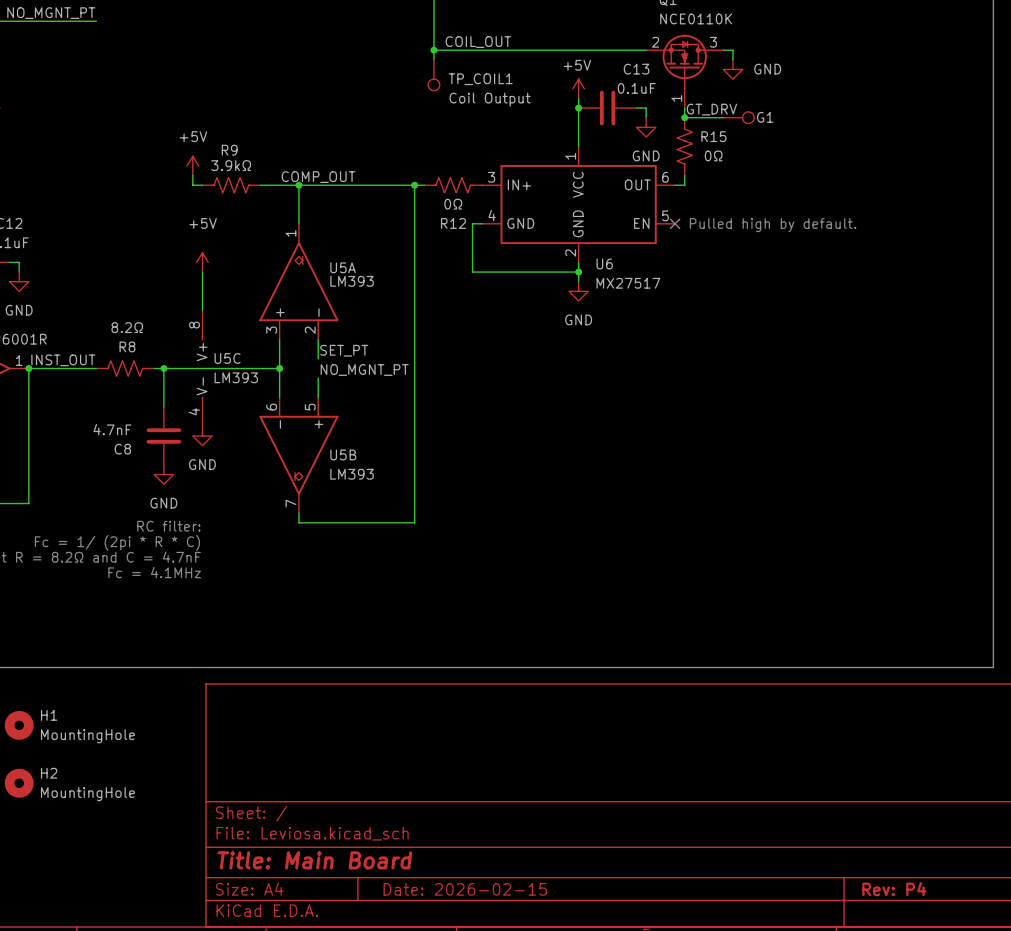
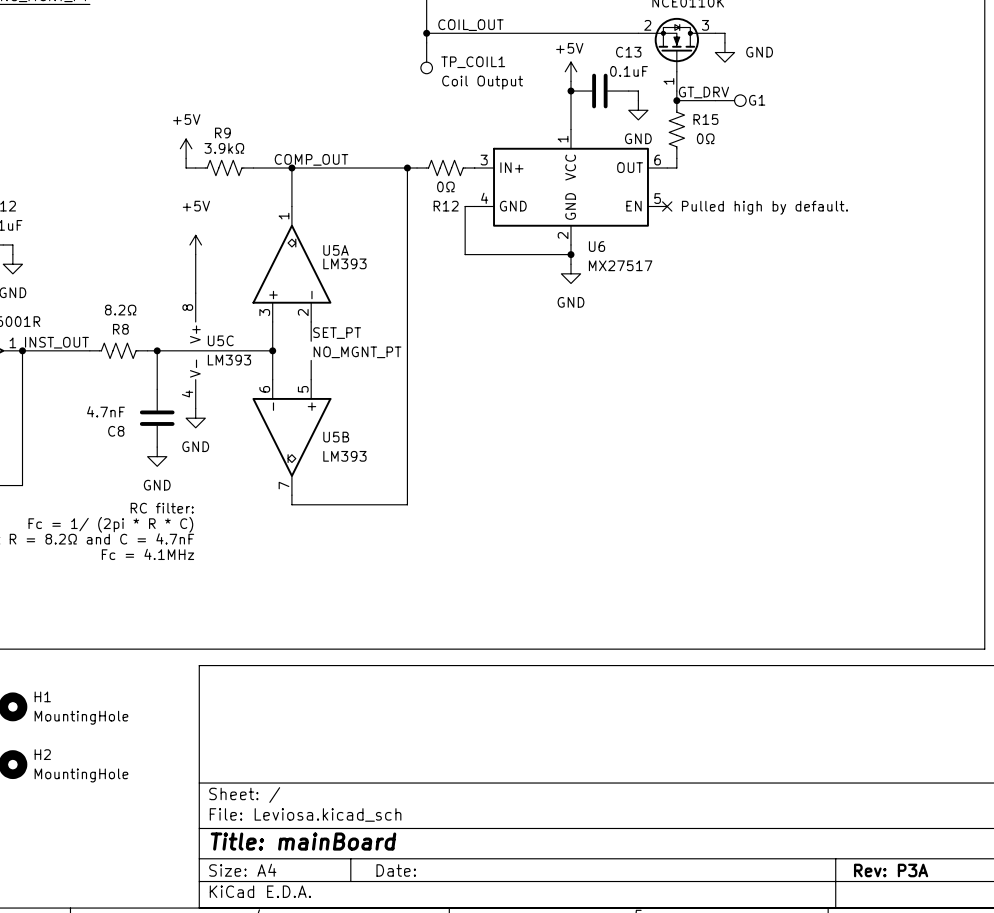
title block: Title: Main Board (314, 860) -> Title: mainBoard (303, 841)
title block: Date: 2026-02-15 (465, 889) -> Date: (396, 870)
title block: Rev: P4 (894, 889) -> Rev: P3A (891, 870)

